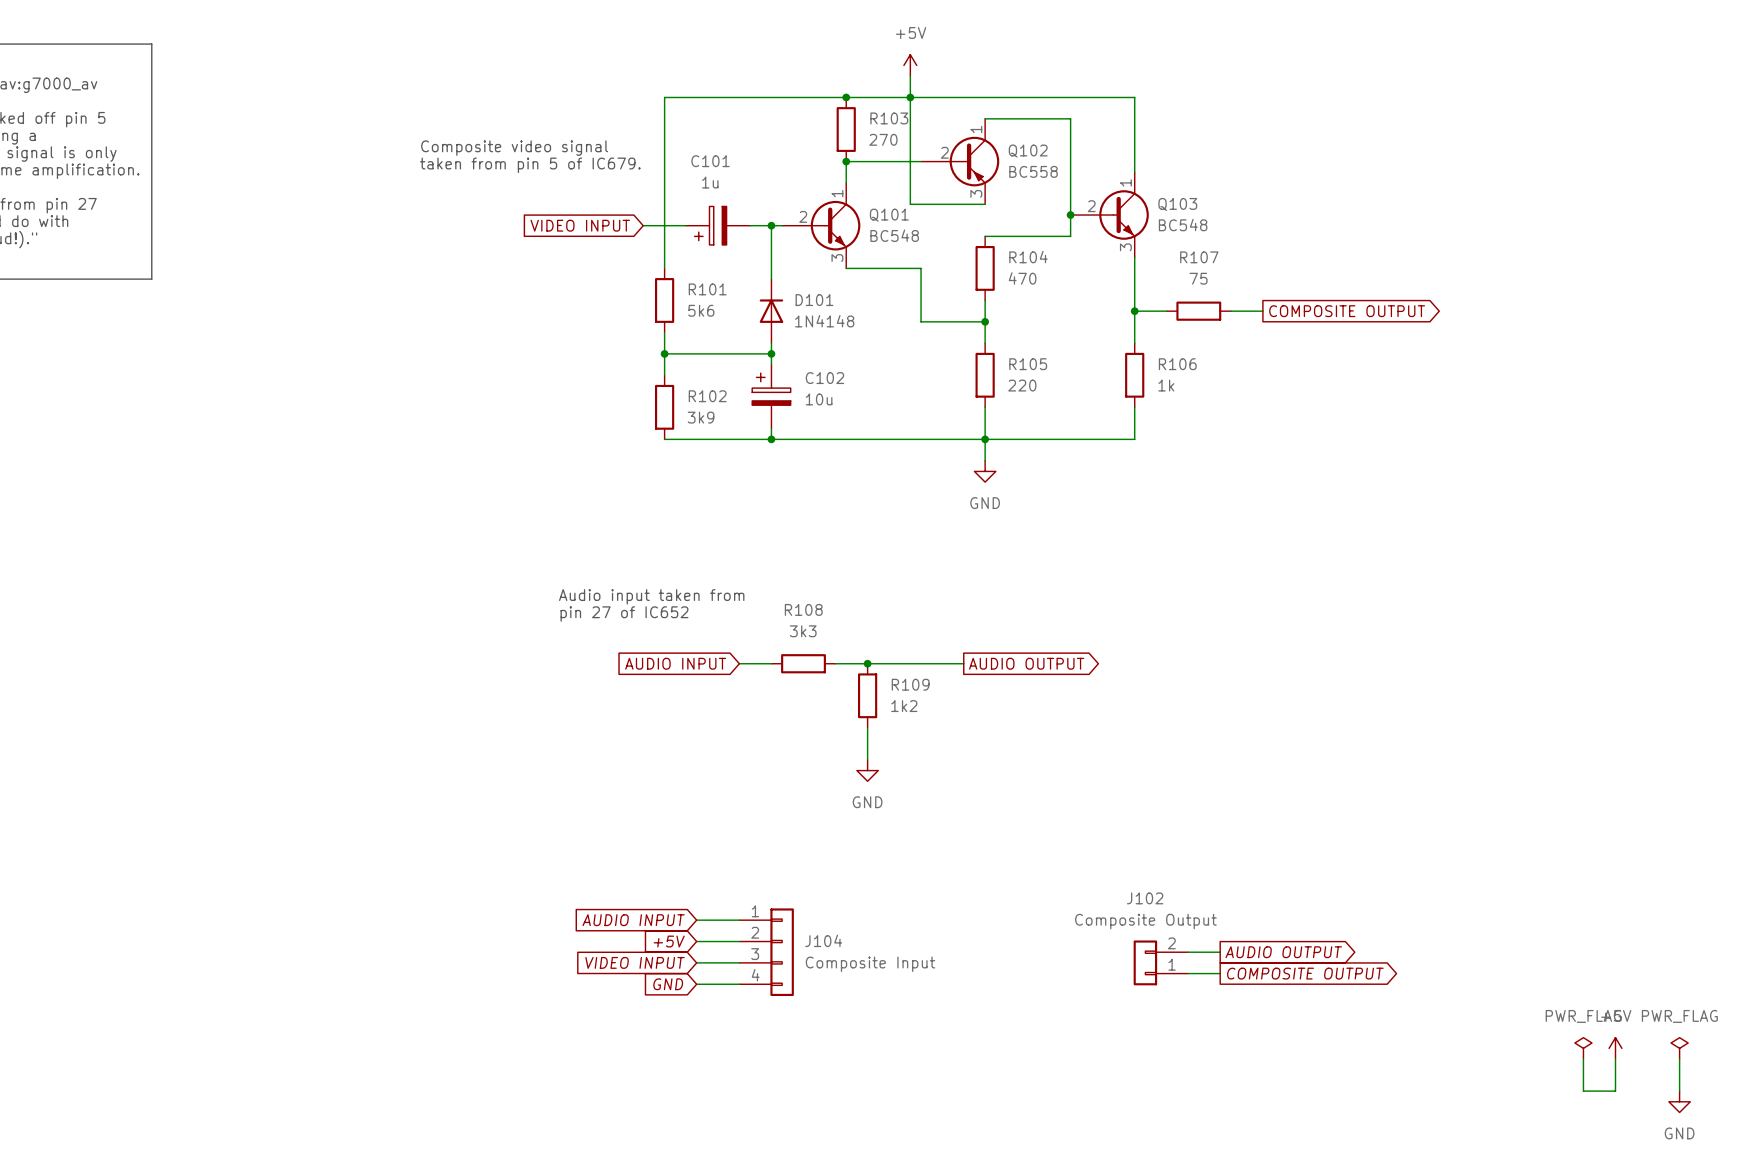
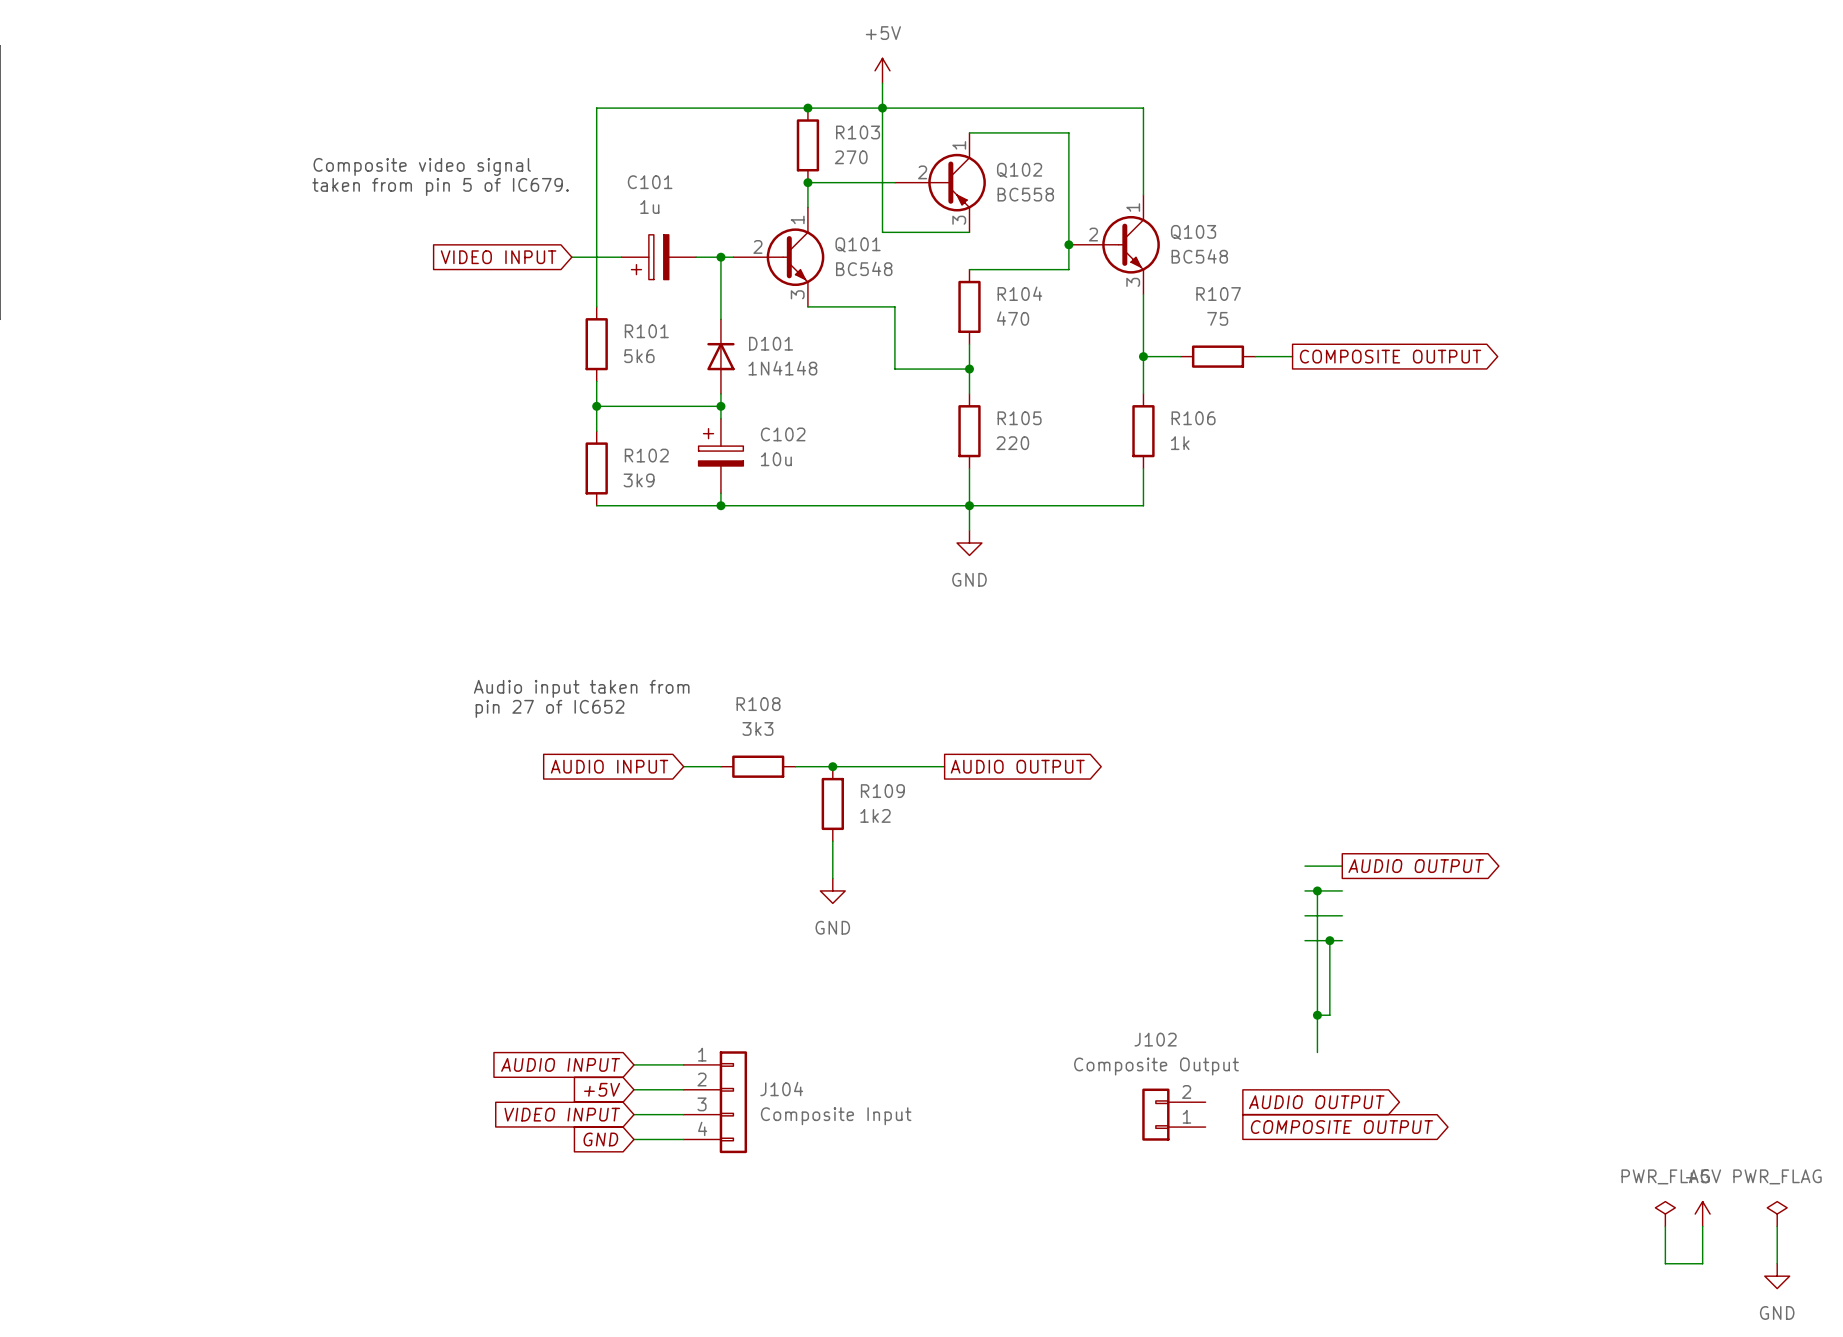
wire: none -> (1305, 866) (1342, 866)
global label: none -> AUDIO OUTPUT (1416, 866)
wire: none -> (1305, 890) (1342, 890)
wire: none -> (1317, 890) (1317, 1052)
junction: none -> (1317, 890)
wire: none -> (1329, 940) (1329, 1015) (1317, 1015)
junction: none -> (1329, 940)
junction: none -> (1317, 1015)
wire: (1188, 952) (1220, 952) -> (1305, 915) (1342, 915)
wire: (1188, 973) (1220, 973) -> (1305, 940) (1342, 940)

